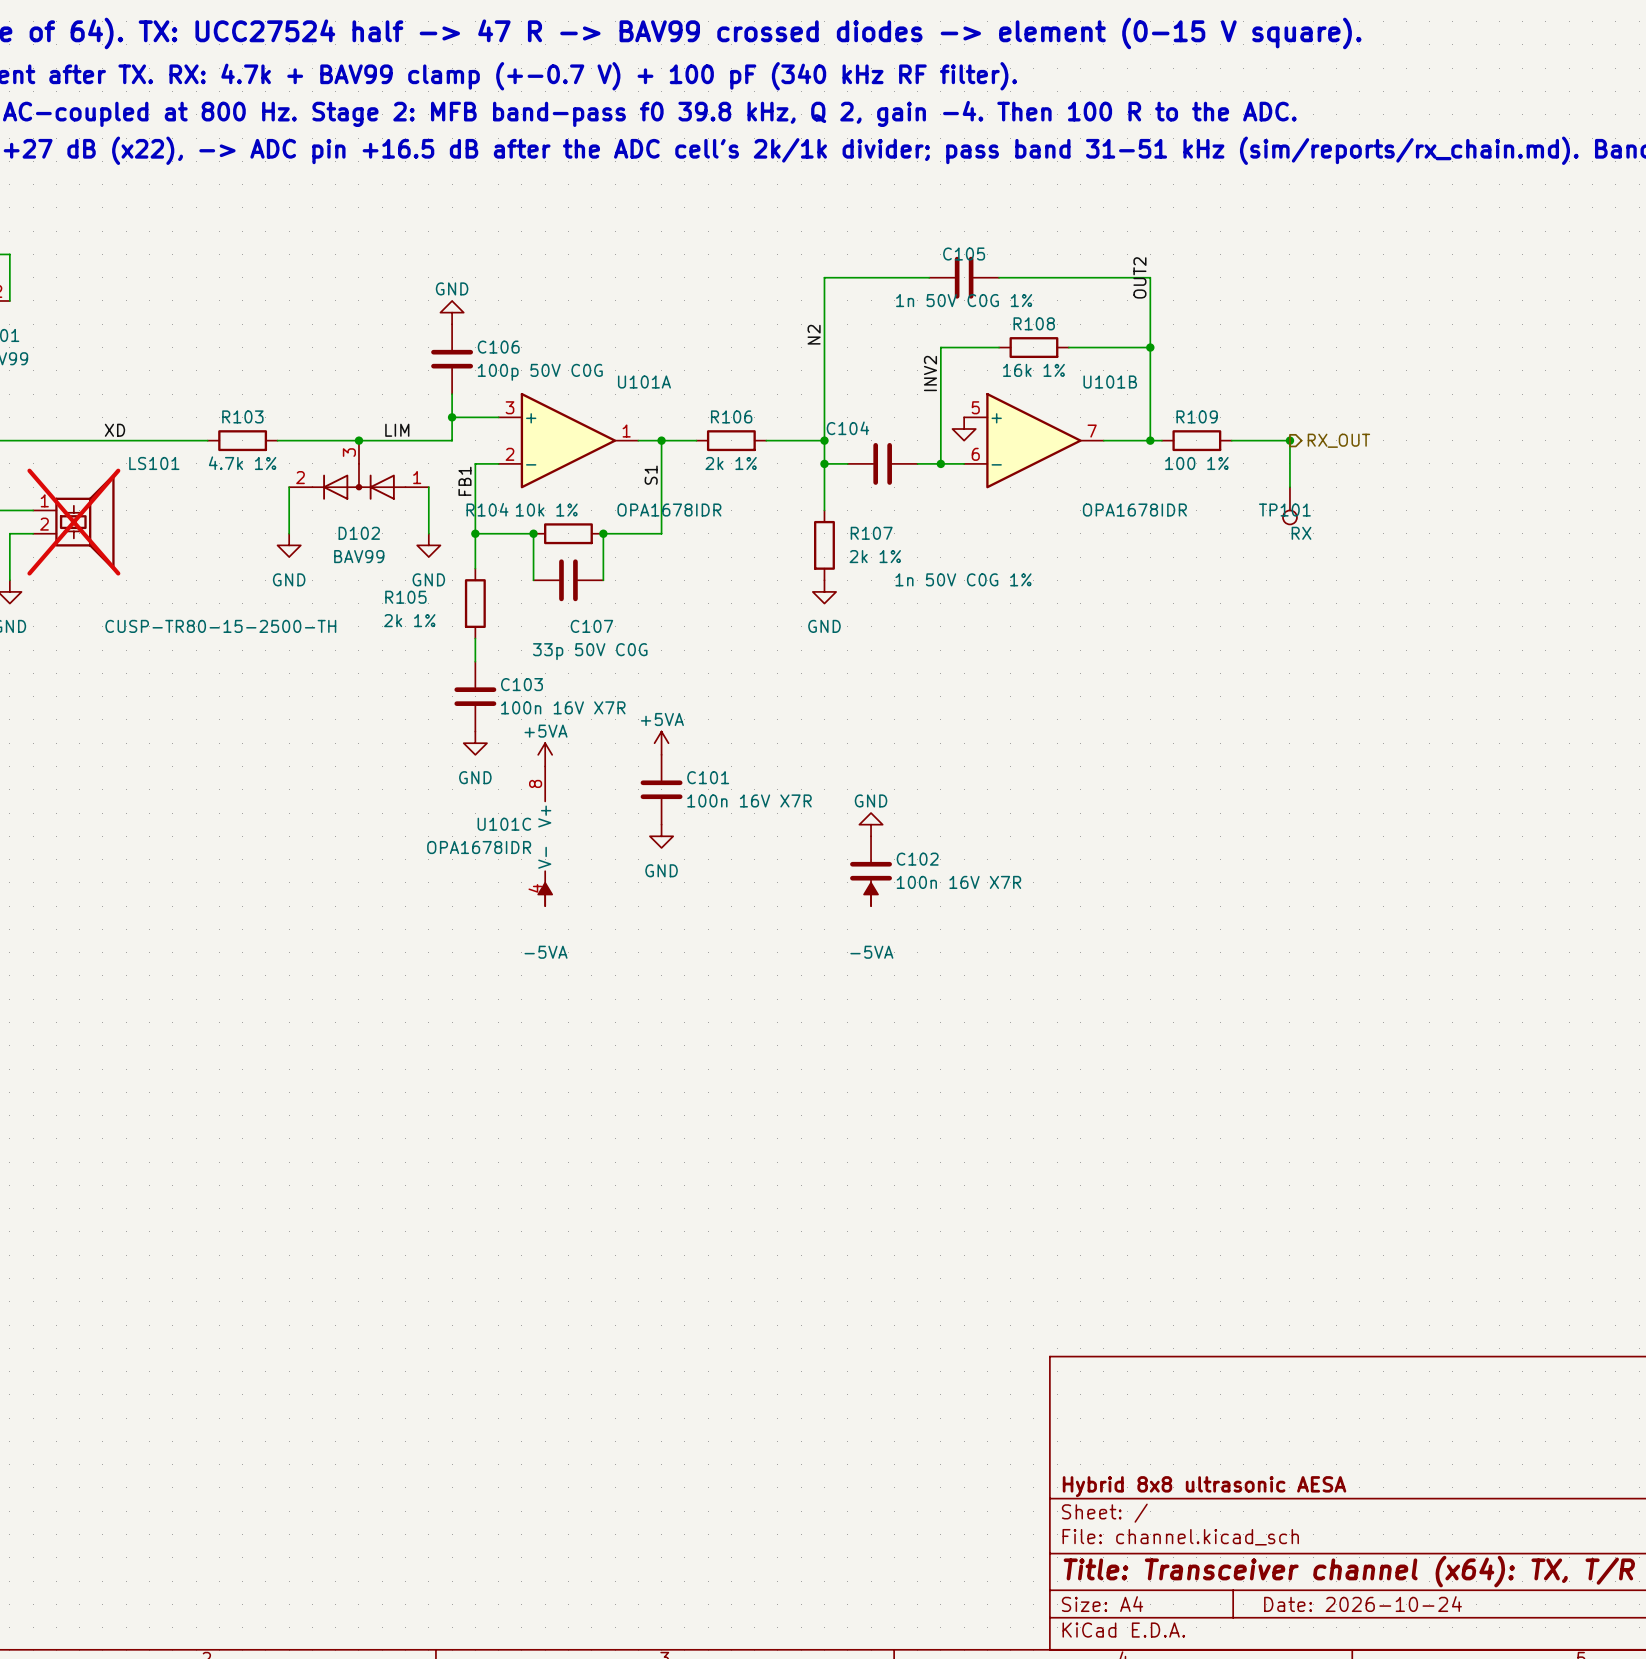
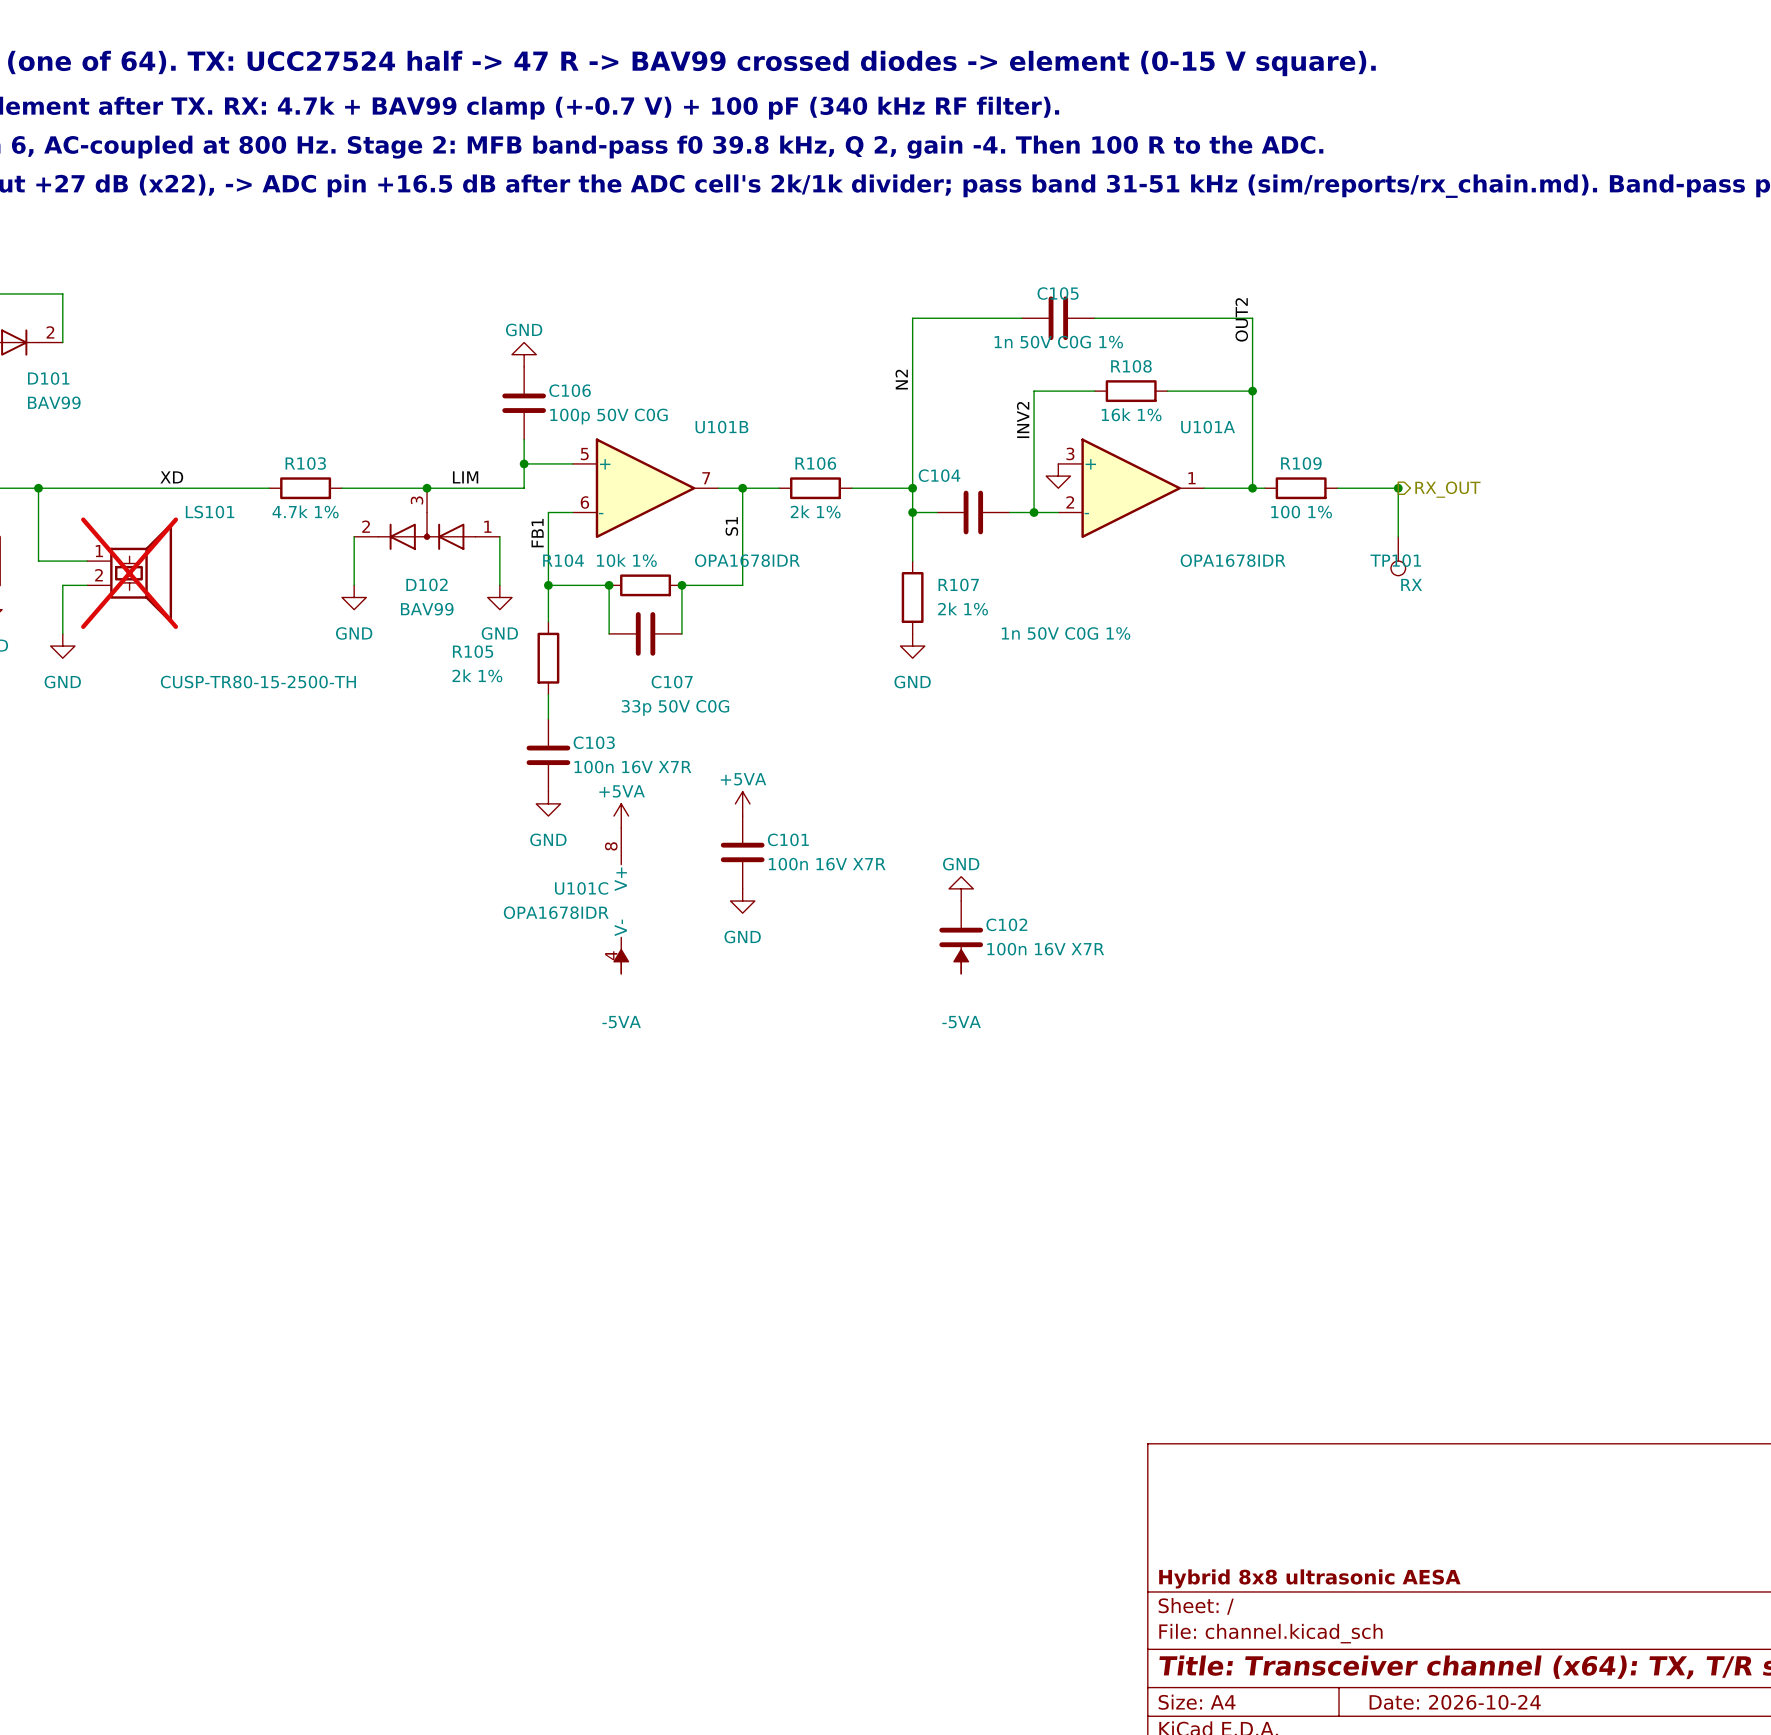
U101A position: (568, 440) -> (1131, 488)
U101B position: (1033, 440) -> (645, 488)

